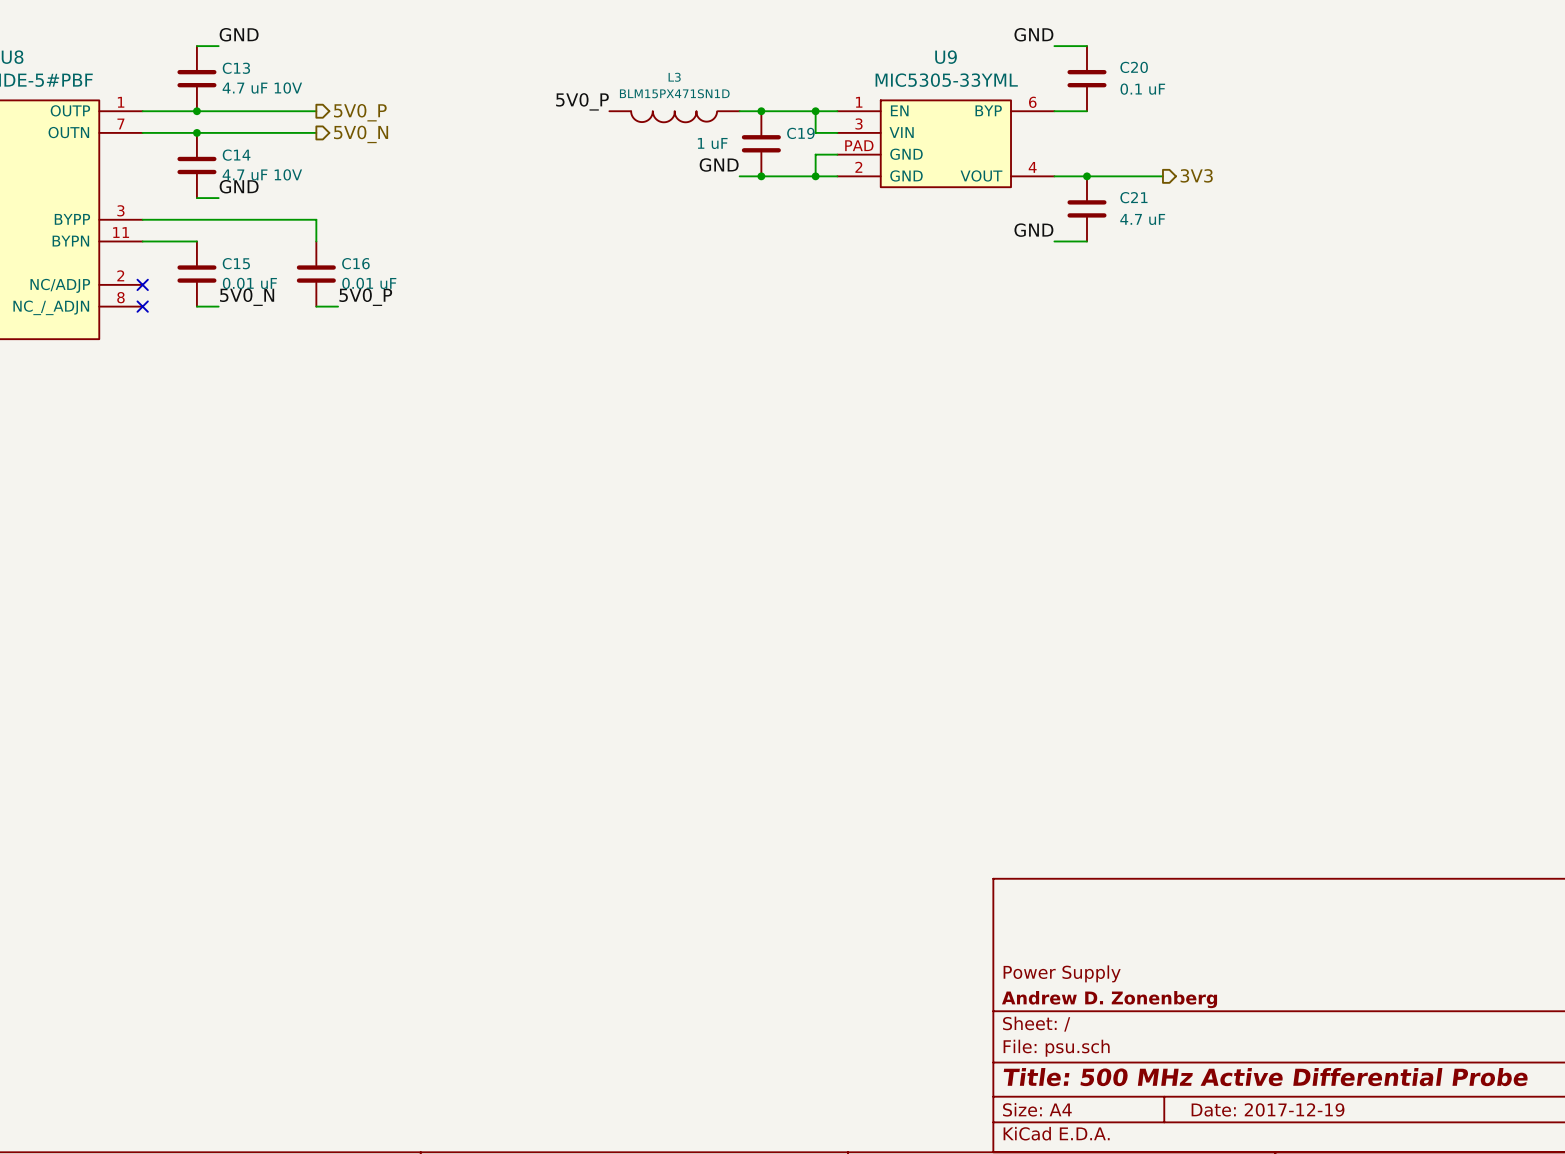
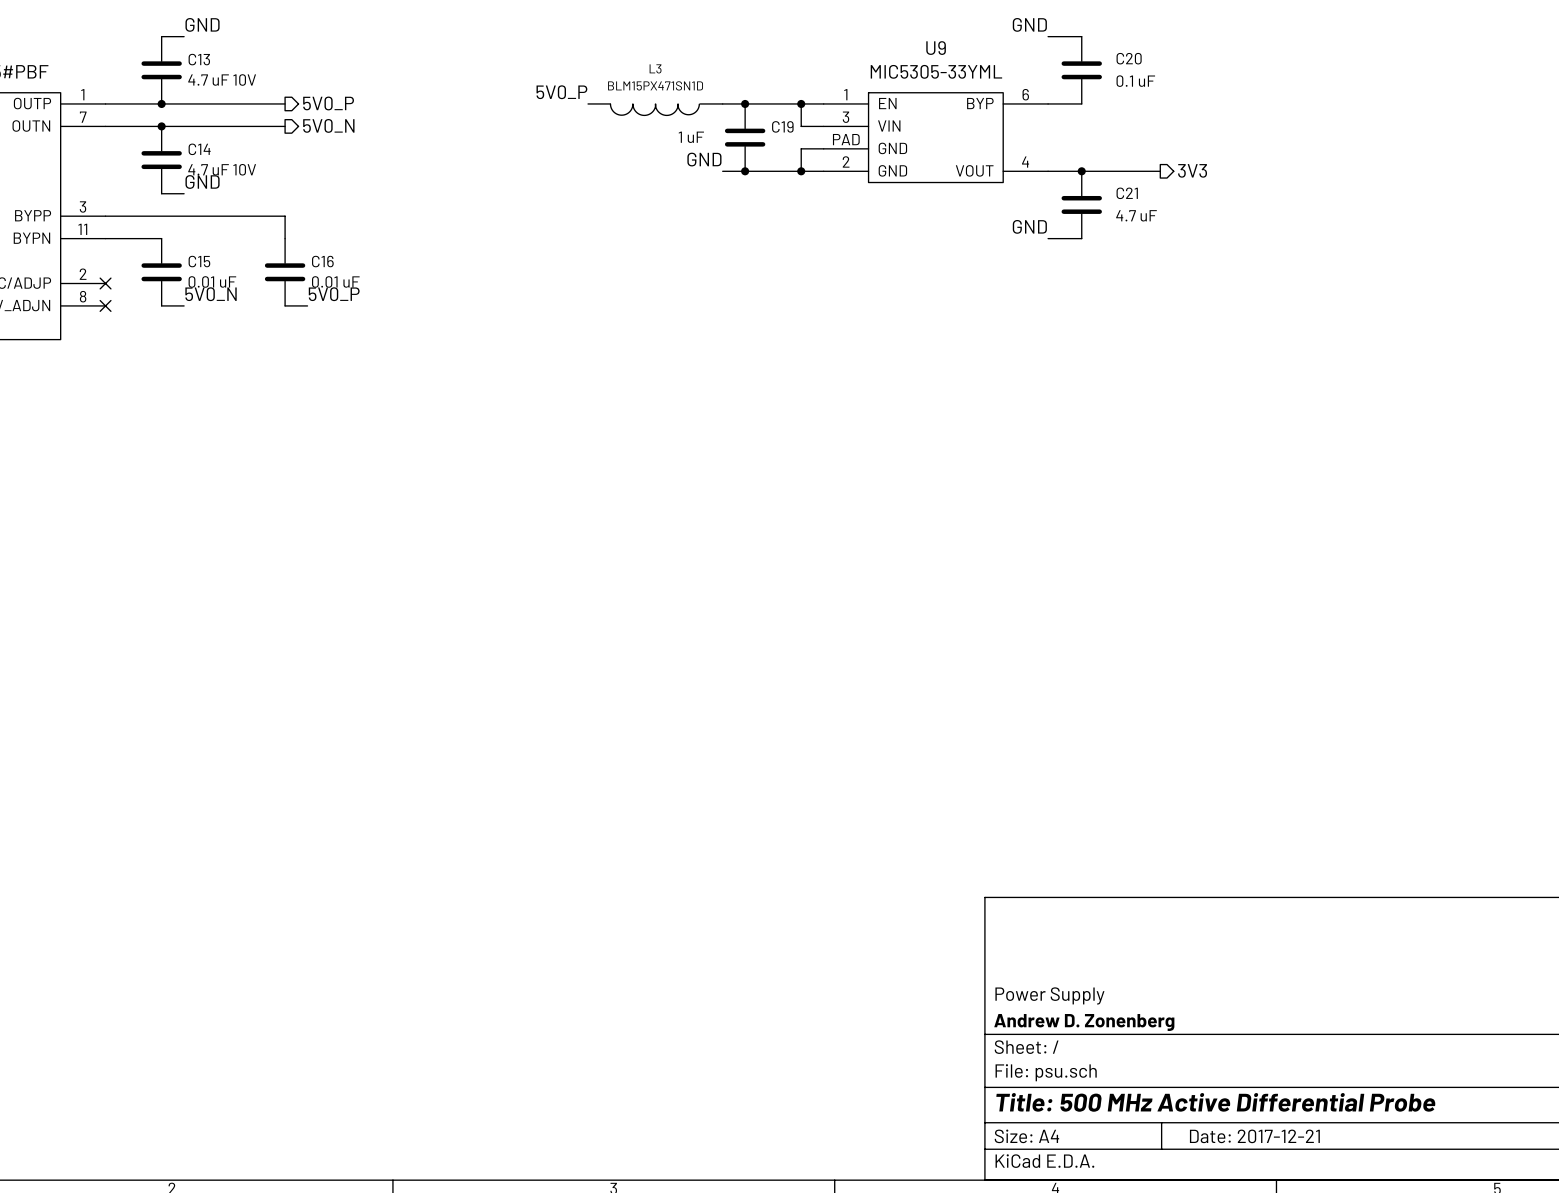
title block: Date: 2017-12-19 (1268, 1109) -> Date: 2017-12-21 (1254, 1136)

